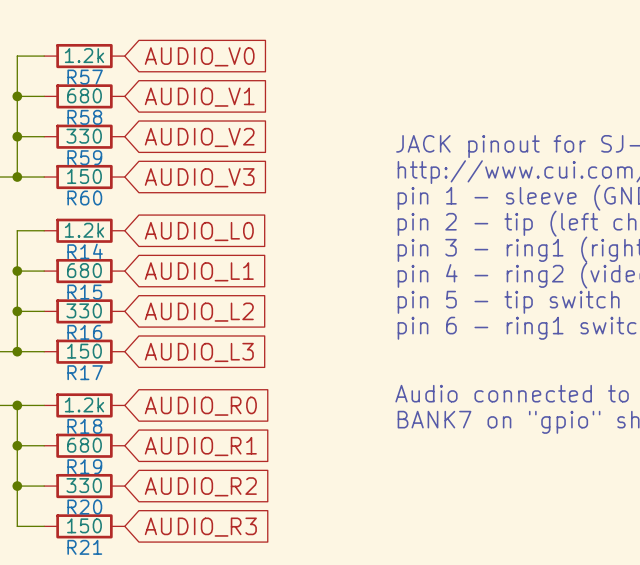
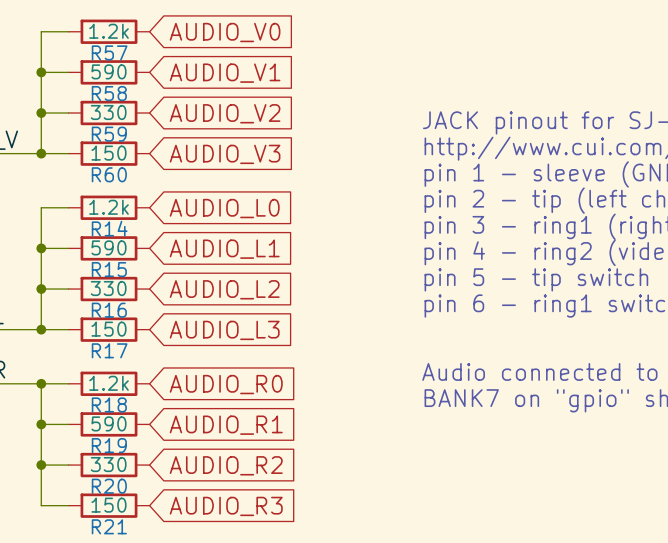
R58 value: 680 (84, 95) -> 590 (109, 71)
R15 value: 680 (84, 270) -> 590 (109, 247)
R19 value: 680 (84, 445) -> 590 (109, 423)

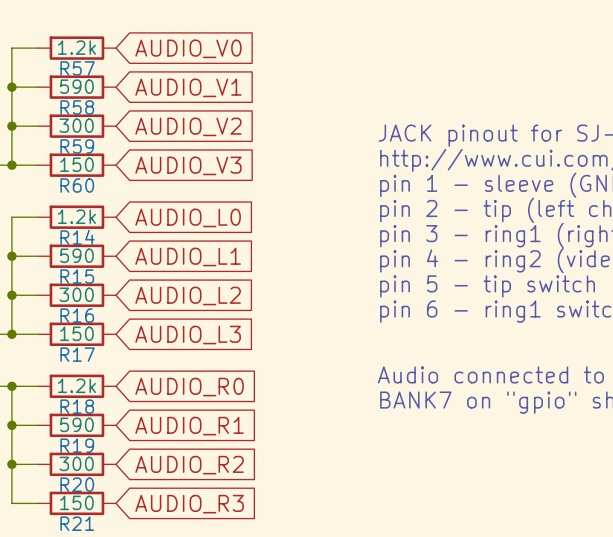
R59 value: 330 (108, 112) -> 300 (76, 125)
R16 value: 330 (108, 288) -> 300 (76, 294)
R20 value: 330 (108, 464) -> 300 (76, 463)

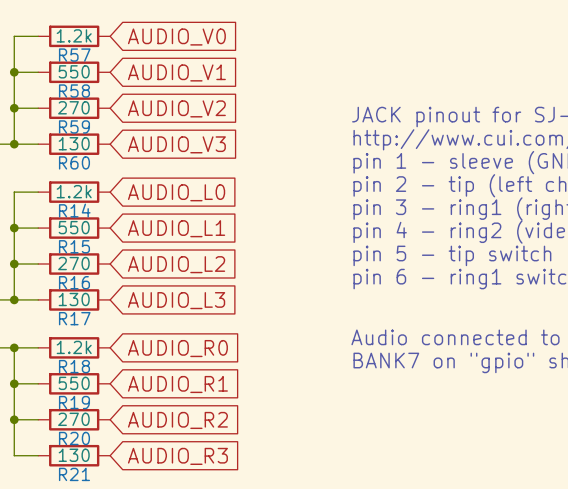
R58 value: 590 (76, 86) -> 550 (74, 71)
R59 value: 300 (76, 125) -> 270 (73, 107)
R60 value: 150 (76, 164) -> 130 (74, 143)
R15 value: 590 (76, 255) -> 550 (74, 227)
R16 value: 300 (76, 294) -> 270 (73, 263)
R17 value: 150 (76, 333) -> 130 (74, 299)
R19 value: 590 (76, 424) -> 550 (74, 383)
R20 value: 300 (76, 463) -> 270 (73, 419)
R21 value: 150 (76, 502) -> 130 (74, 455)

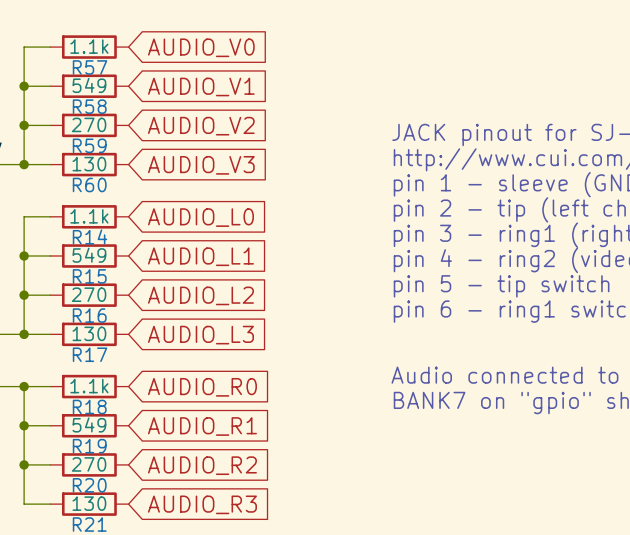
R57 value: 1.2k (74, 35) -> 1.1k (89, 46)
R58 value: 550 (74, 71) -> 549 (89, 85)
R14 value: 1.2k (74, 191) -> 1.1k (89, 216)
R15 value: 550 (74, 227) -> 549 (89, 255)
R18 value: 1.2k (74, 347) -> 1.1k (89, 386)
R19 value: 550 (74, 383) -> 549 (89, 424)

